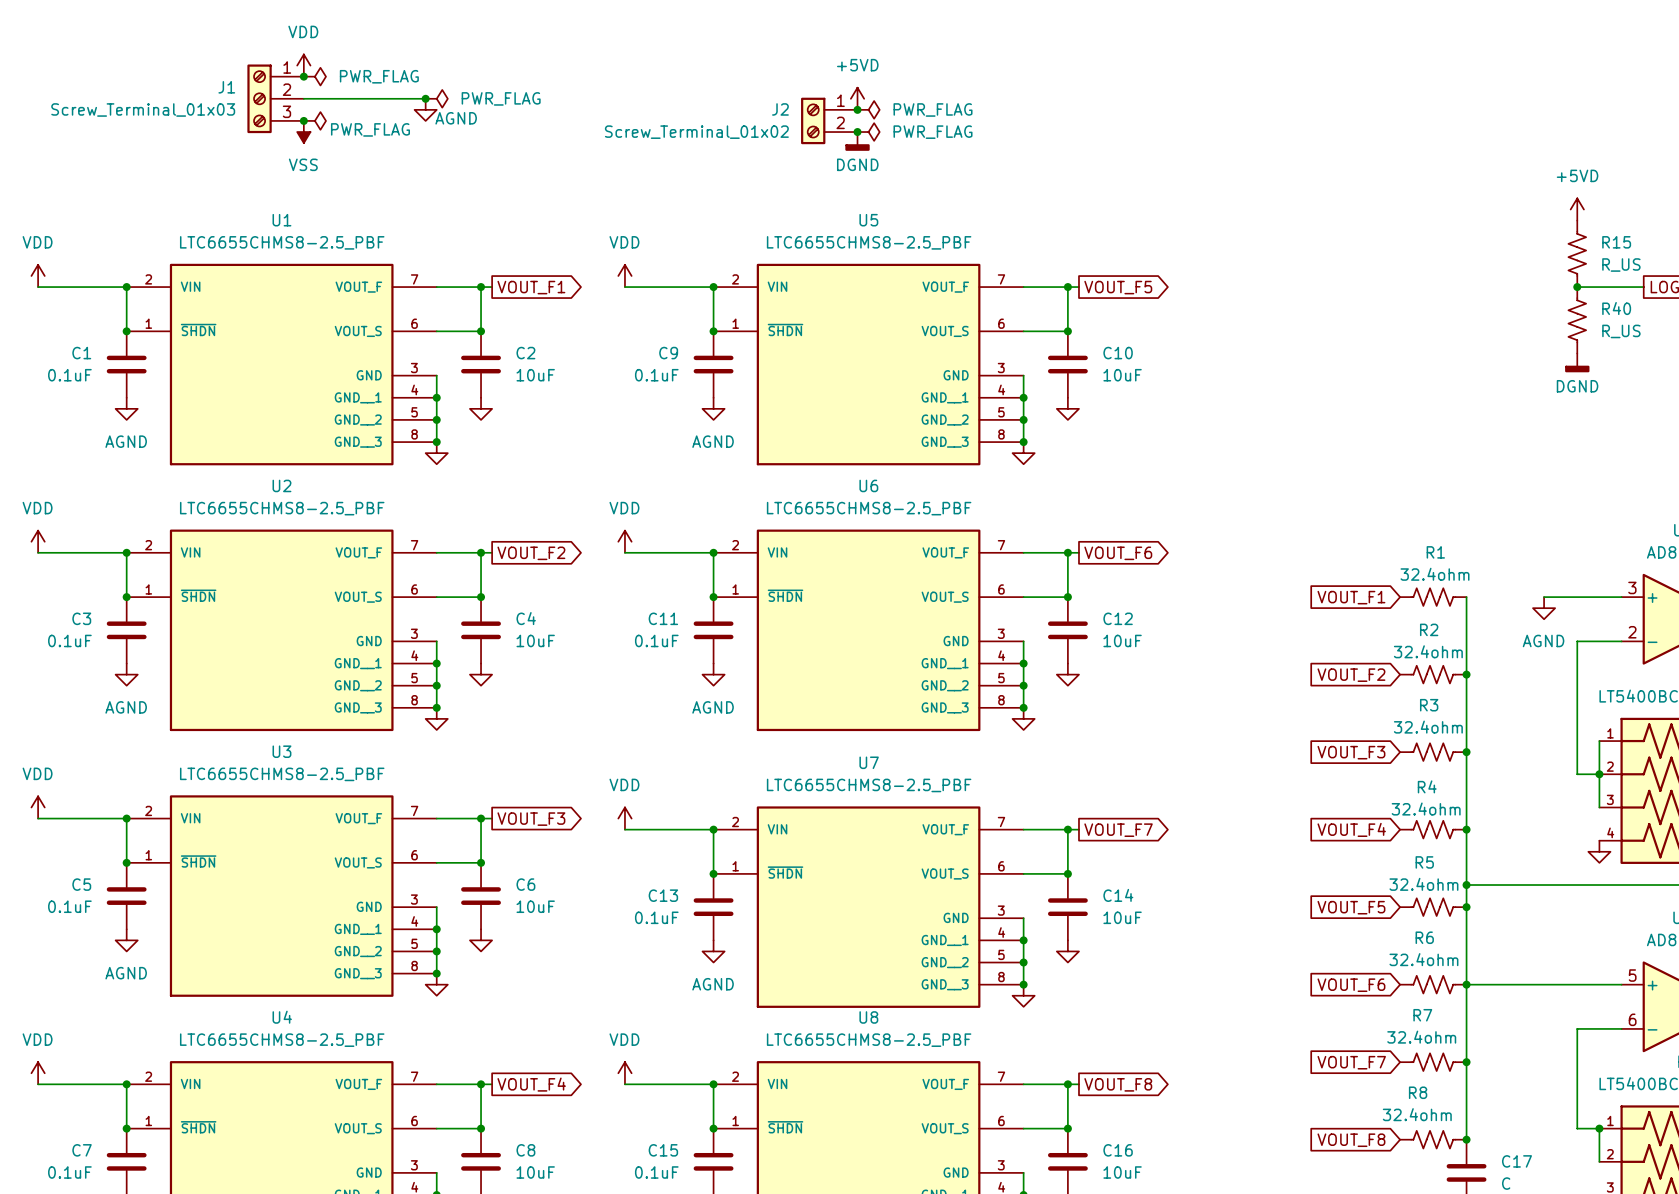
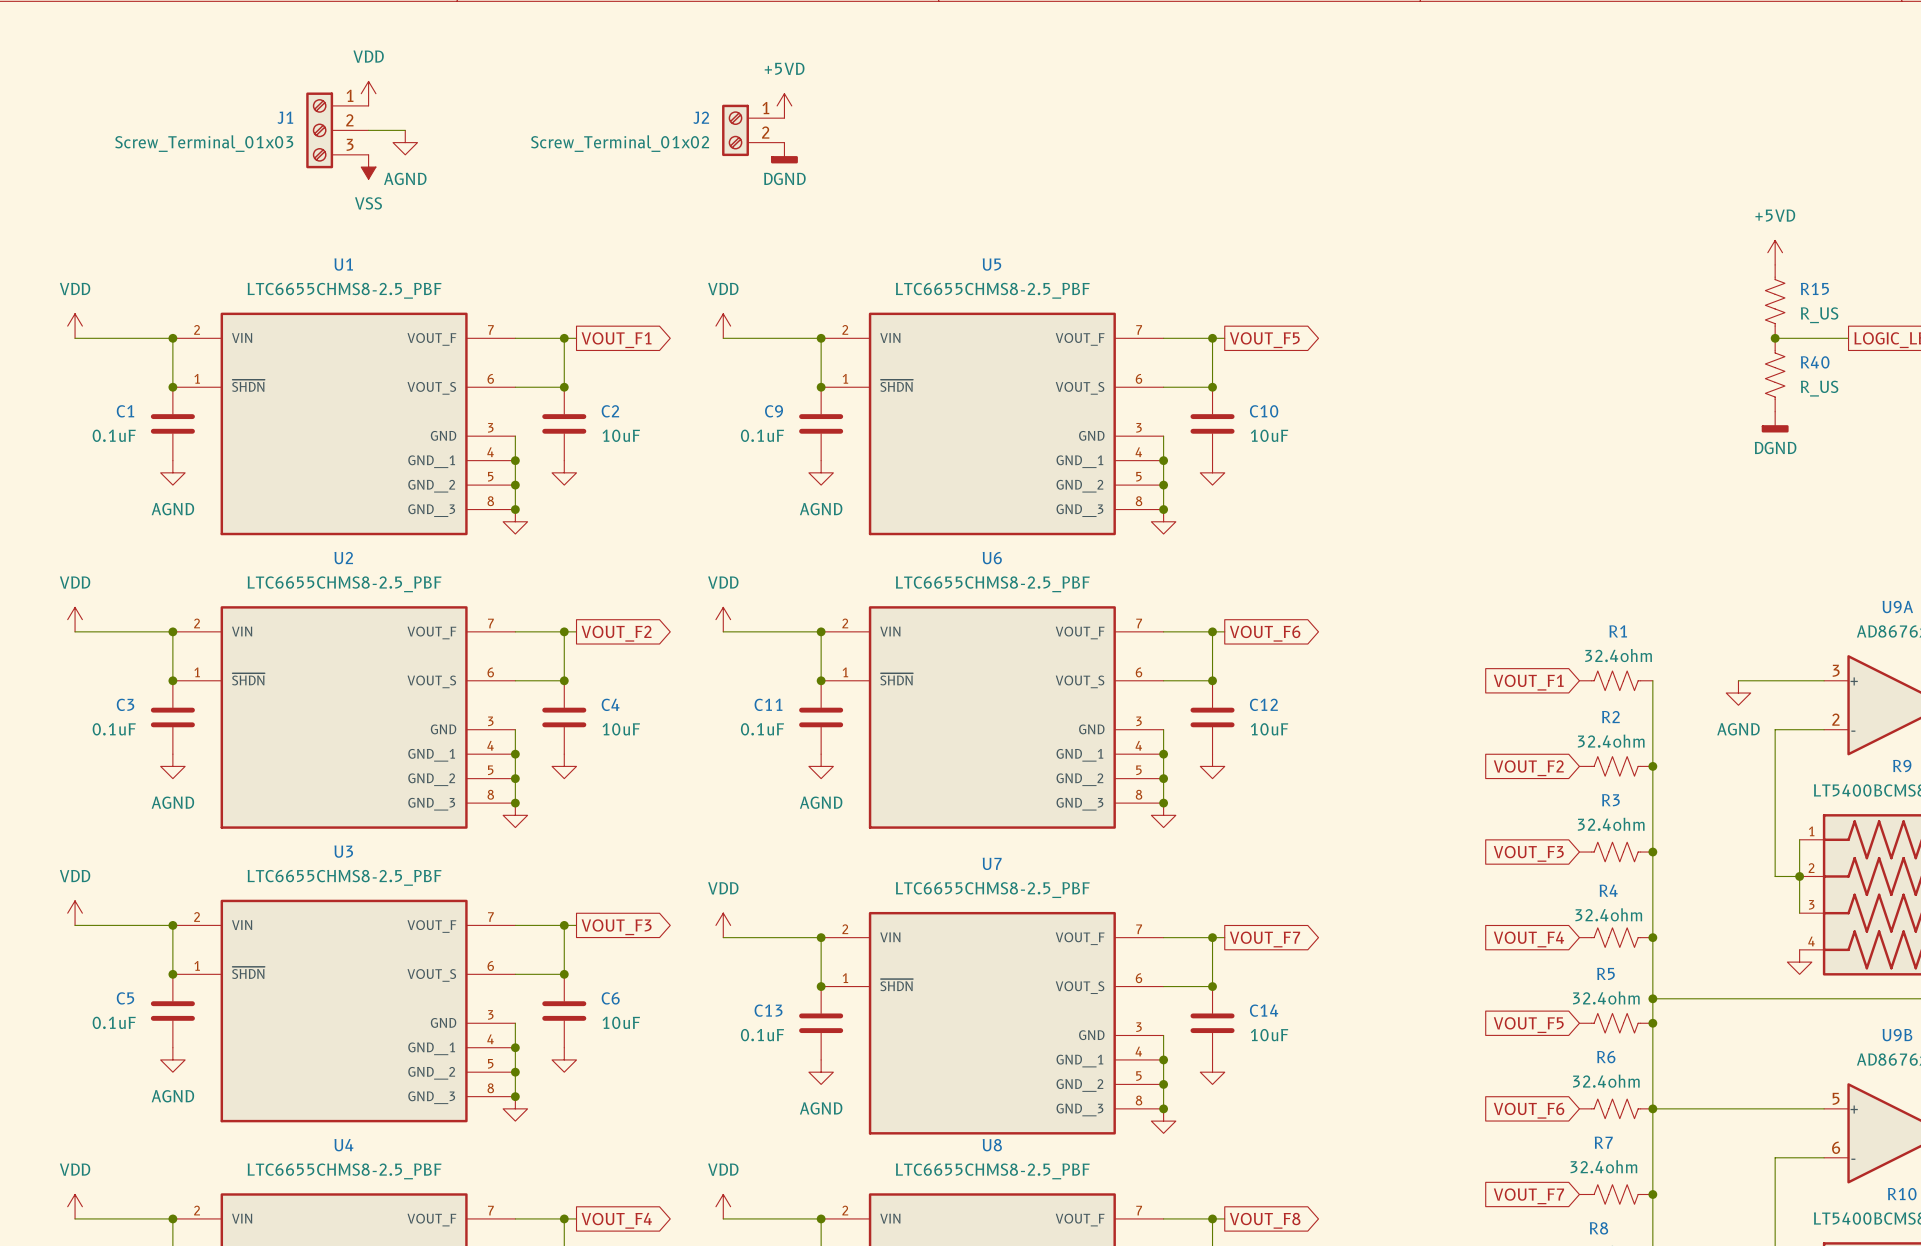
junction: (303, 76) -> none
power symbol: PWR_FLAG (314, 76) -> none
wire: (337, 98) (425, 98) -> none
junction: (425, 98) -> none
power symbol: PWR_FLAG (436, 98) -> none
power symbol position: +5VD (857, 98) -> +5VD (784, 105)
power symbol position: AGND (425, 109) -> AGND (405, 142)
junction: (857, 109) -> none
power symbol: PWR_FLAG (868, 109) -> none
power symbol text position: AGND (456, 118) -> AGND (405, 178)
junction: (303, 120) -> none
power symbol: PWR_FLAG (314, 120) -> none
J2 position: (829, 120) -> (753, 130)
junction: (857, 132) -> none
power symbol: PWR_FLAG (868, 132) -> none
power symbol position: DGND (857, 141) -> DGND (784, 153)

